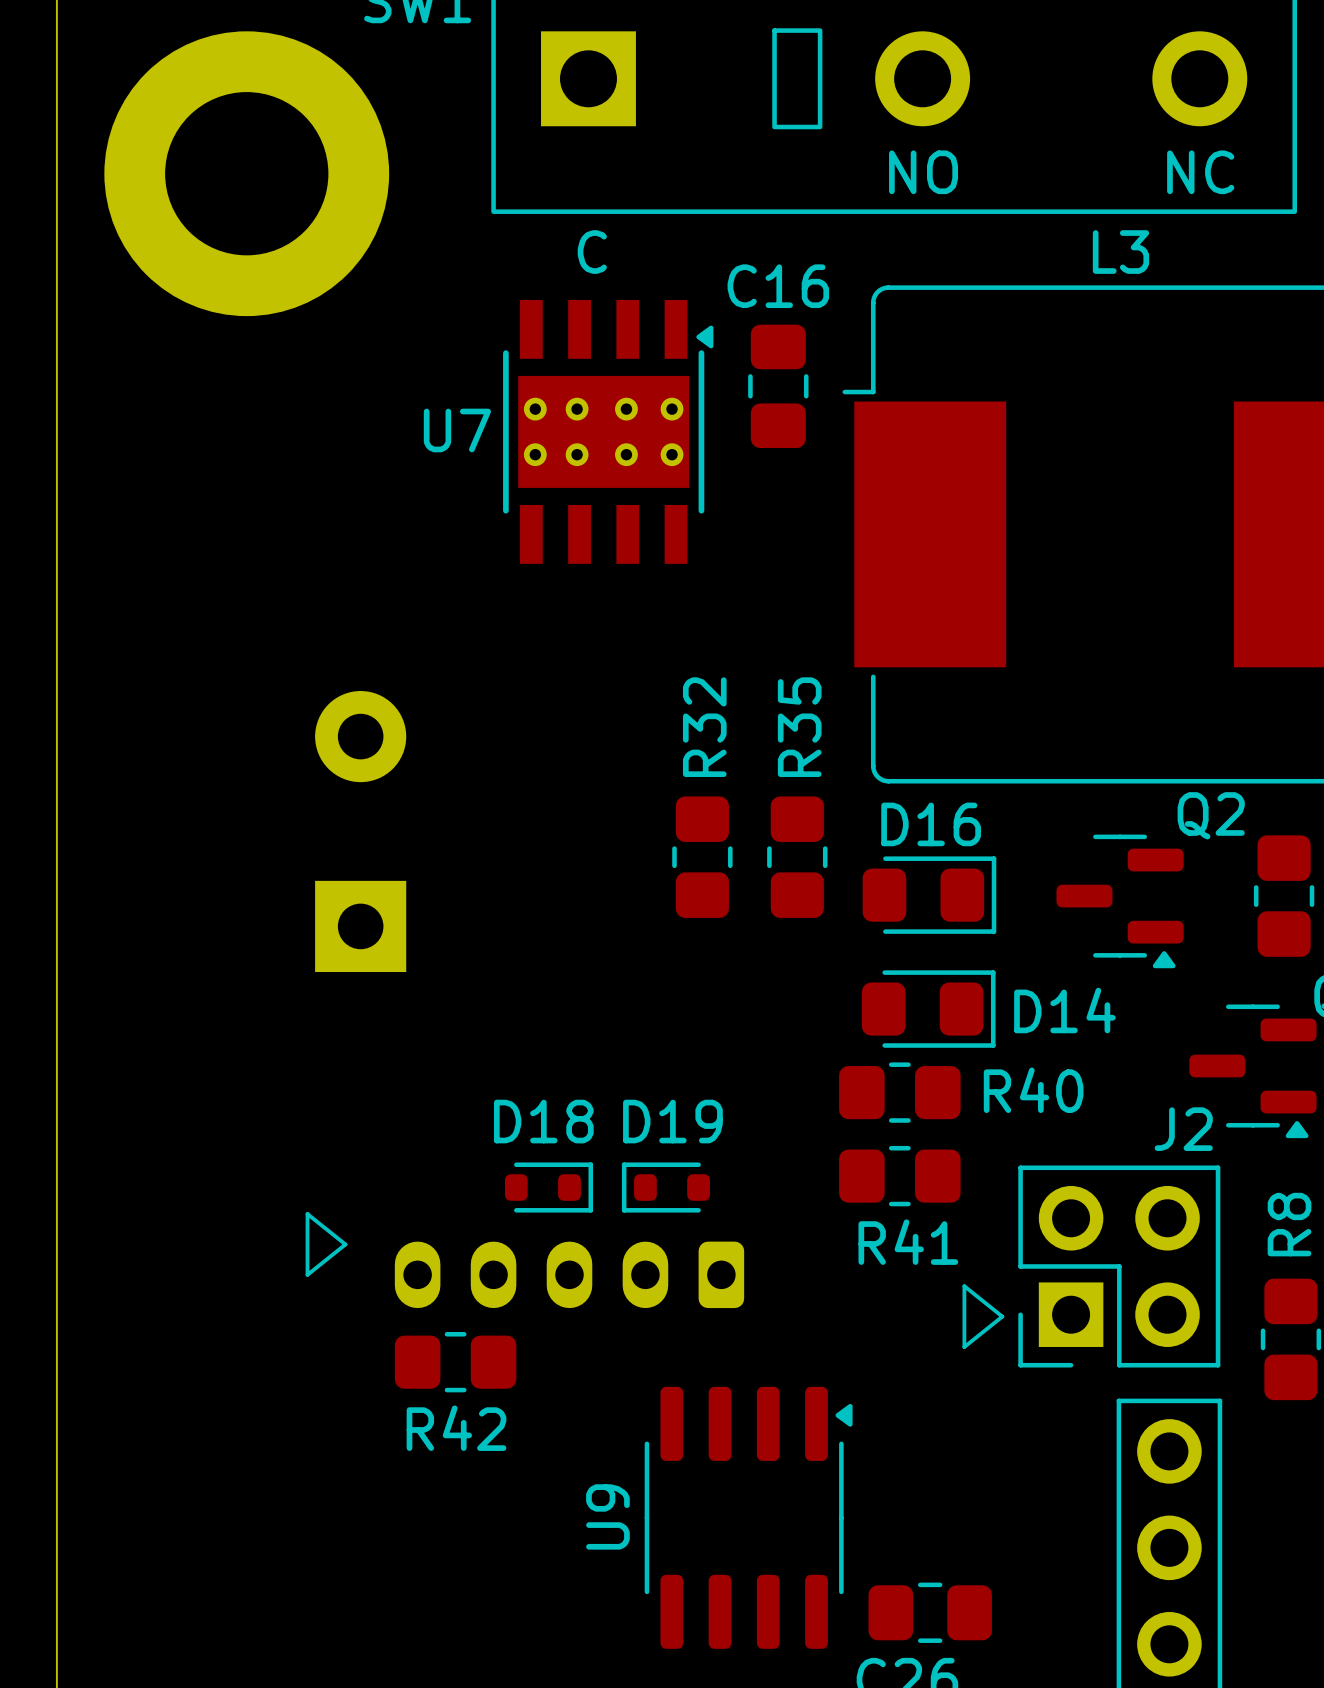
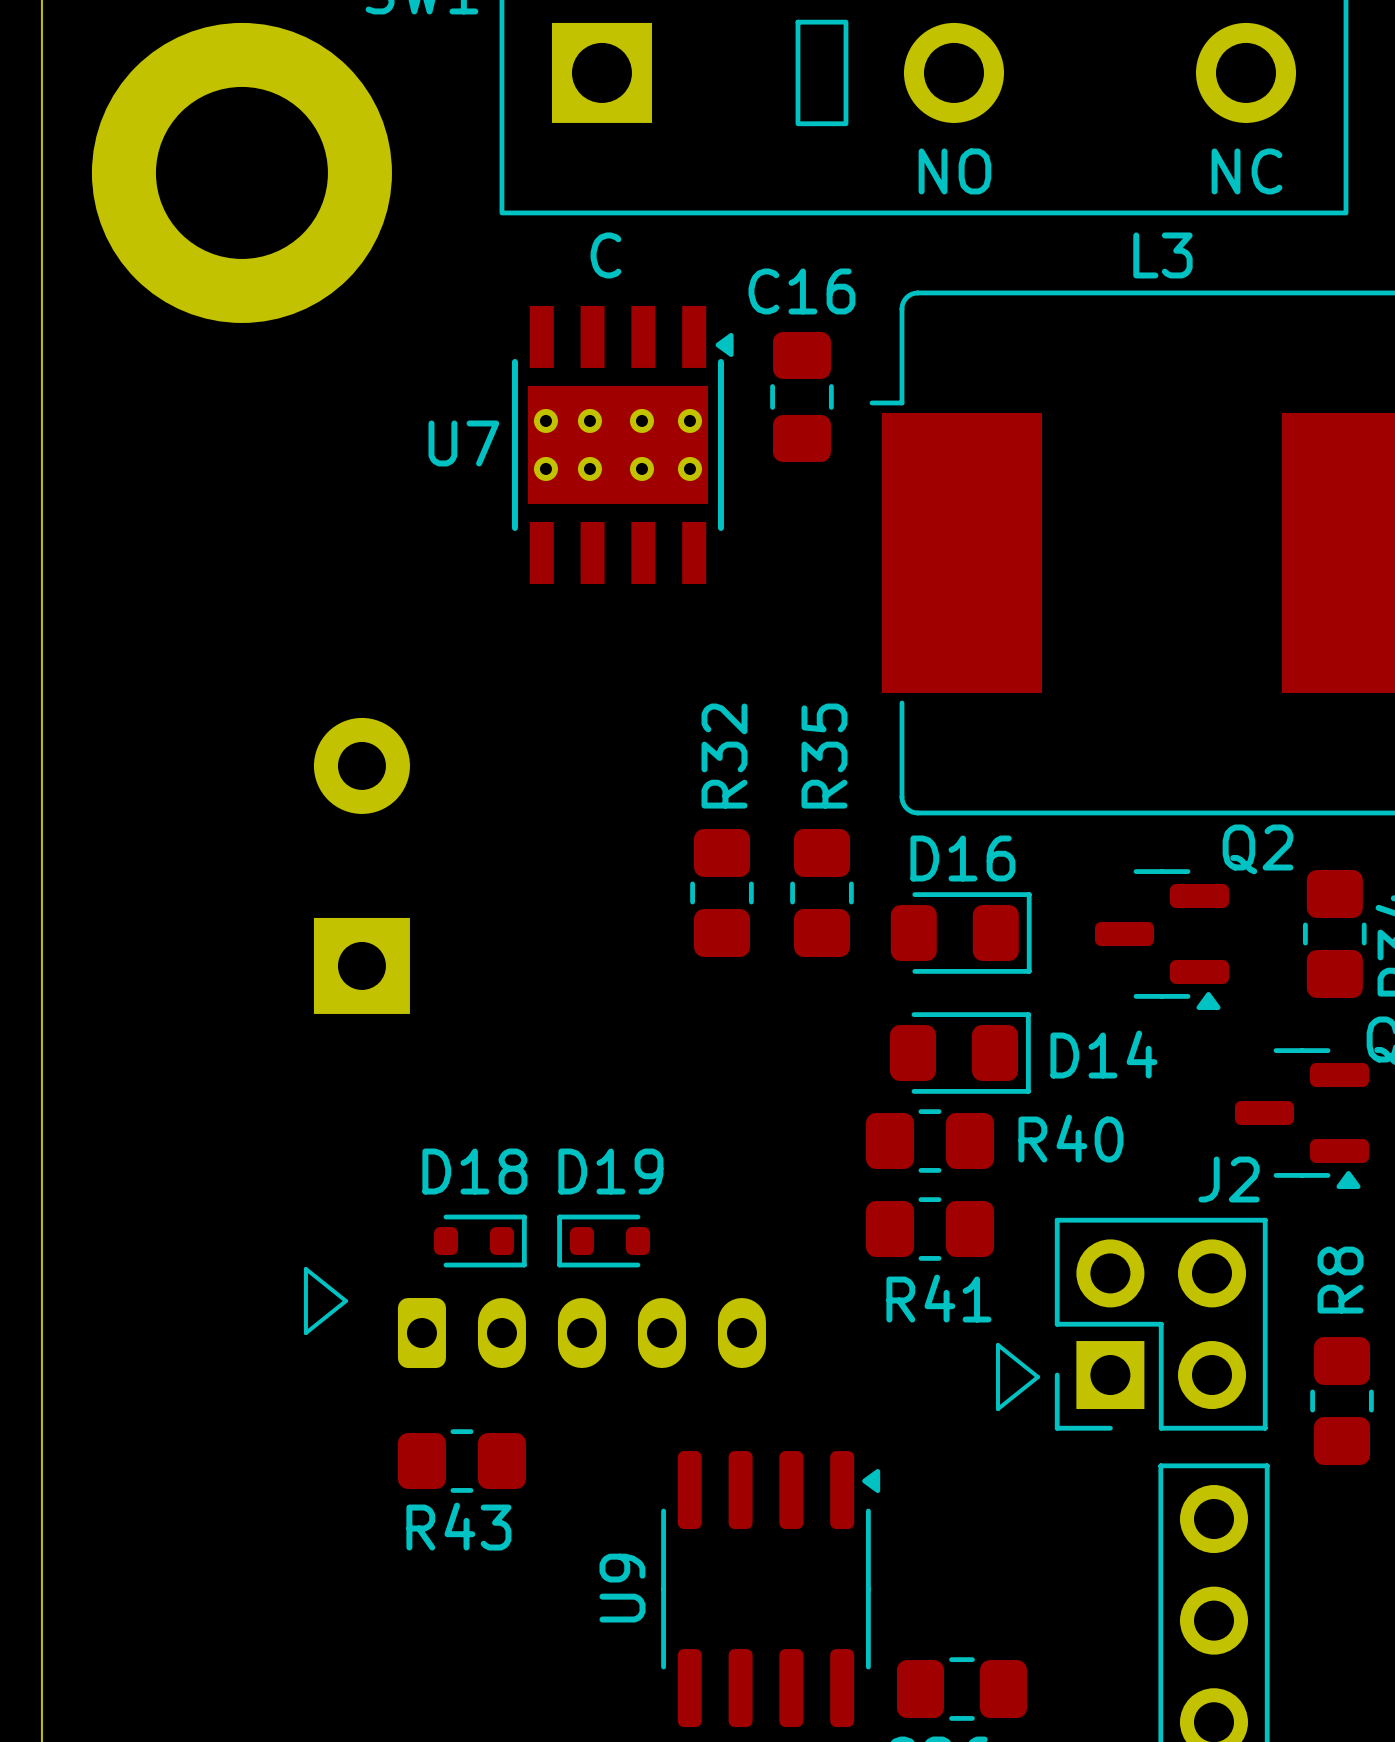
D18 position: (549, 1187) -> (480, 1241)
D19 position: (665, 1187) -> (603, 1241)
part rotation: 0° (569, 1274) -> 180° (581, 1333)
R42 position: (455, 1362) -> (461, 1461)
R42 name: R42 (456, 1428) -> R43 (458, 1526)

